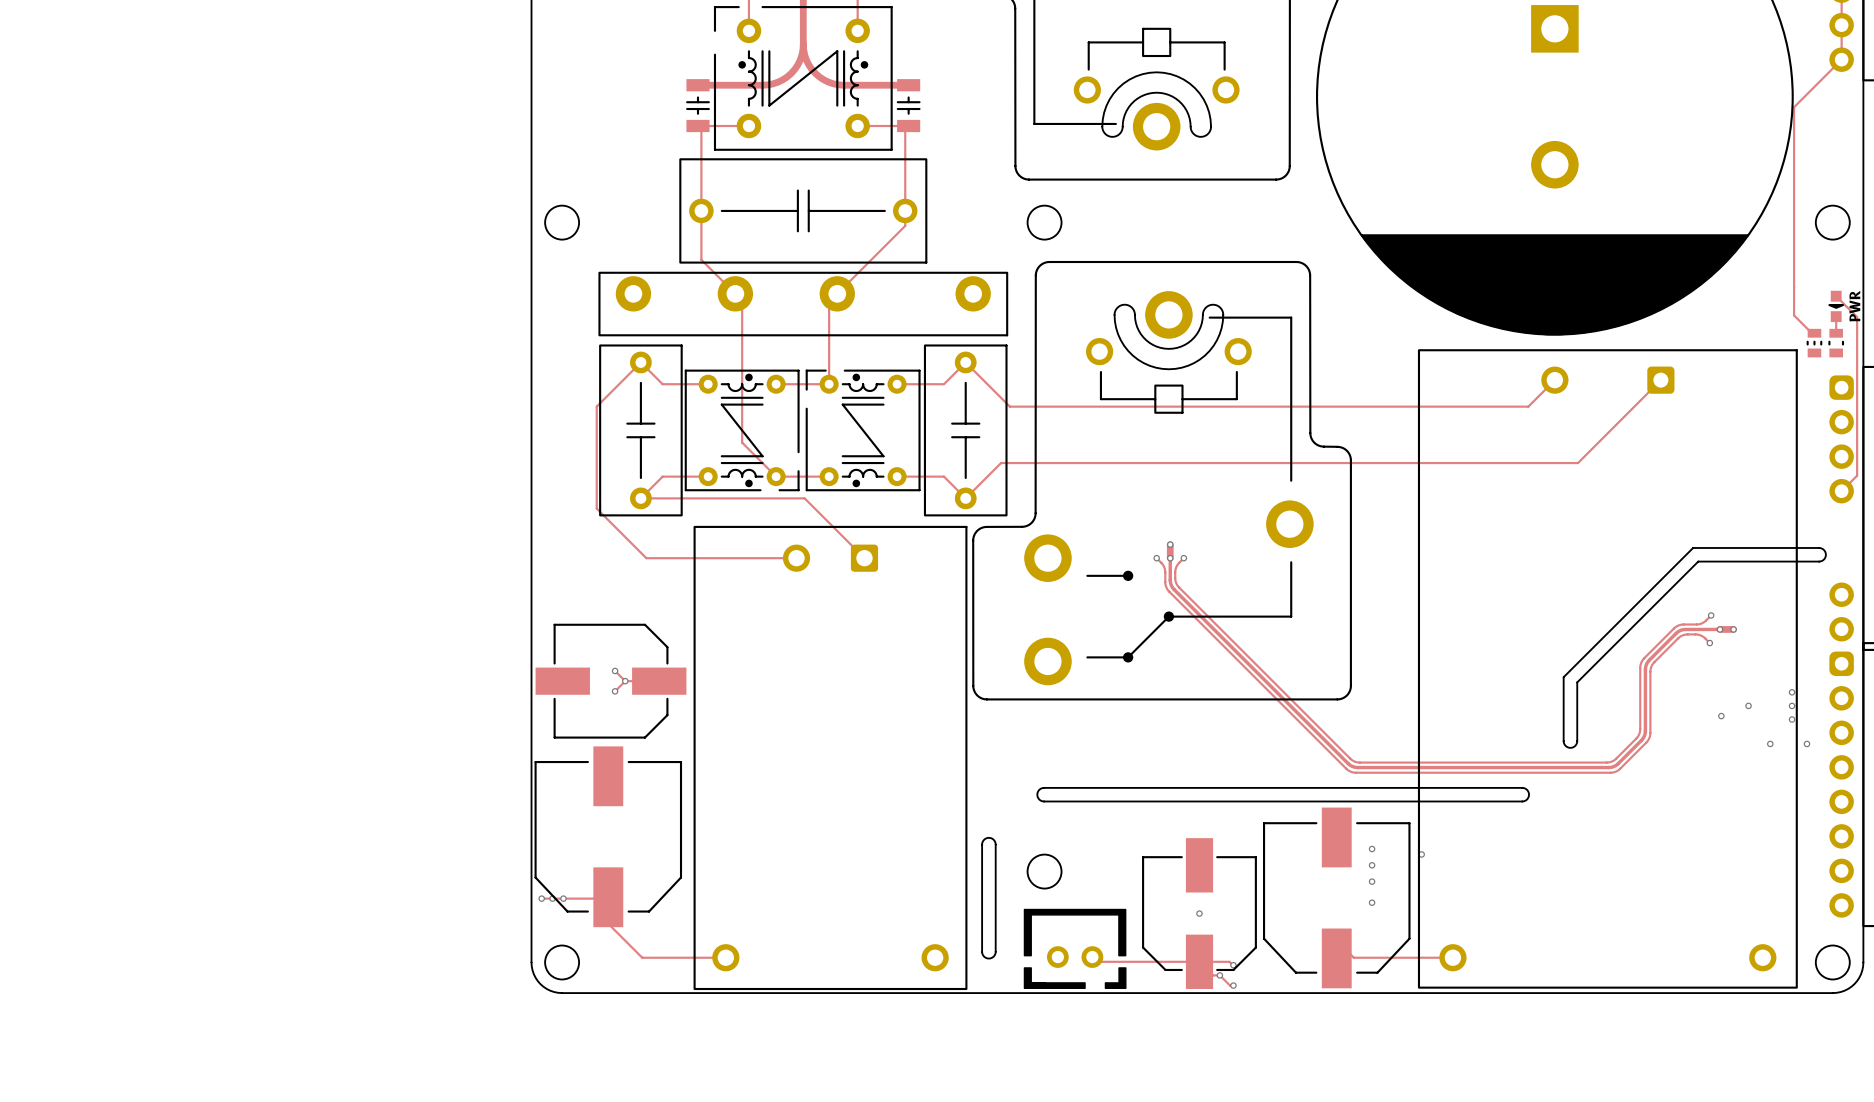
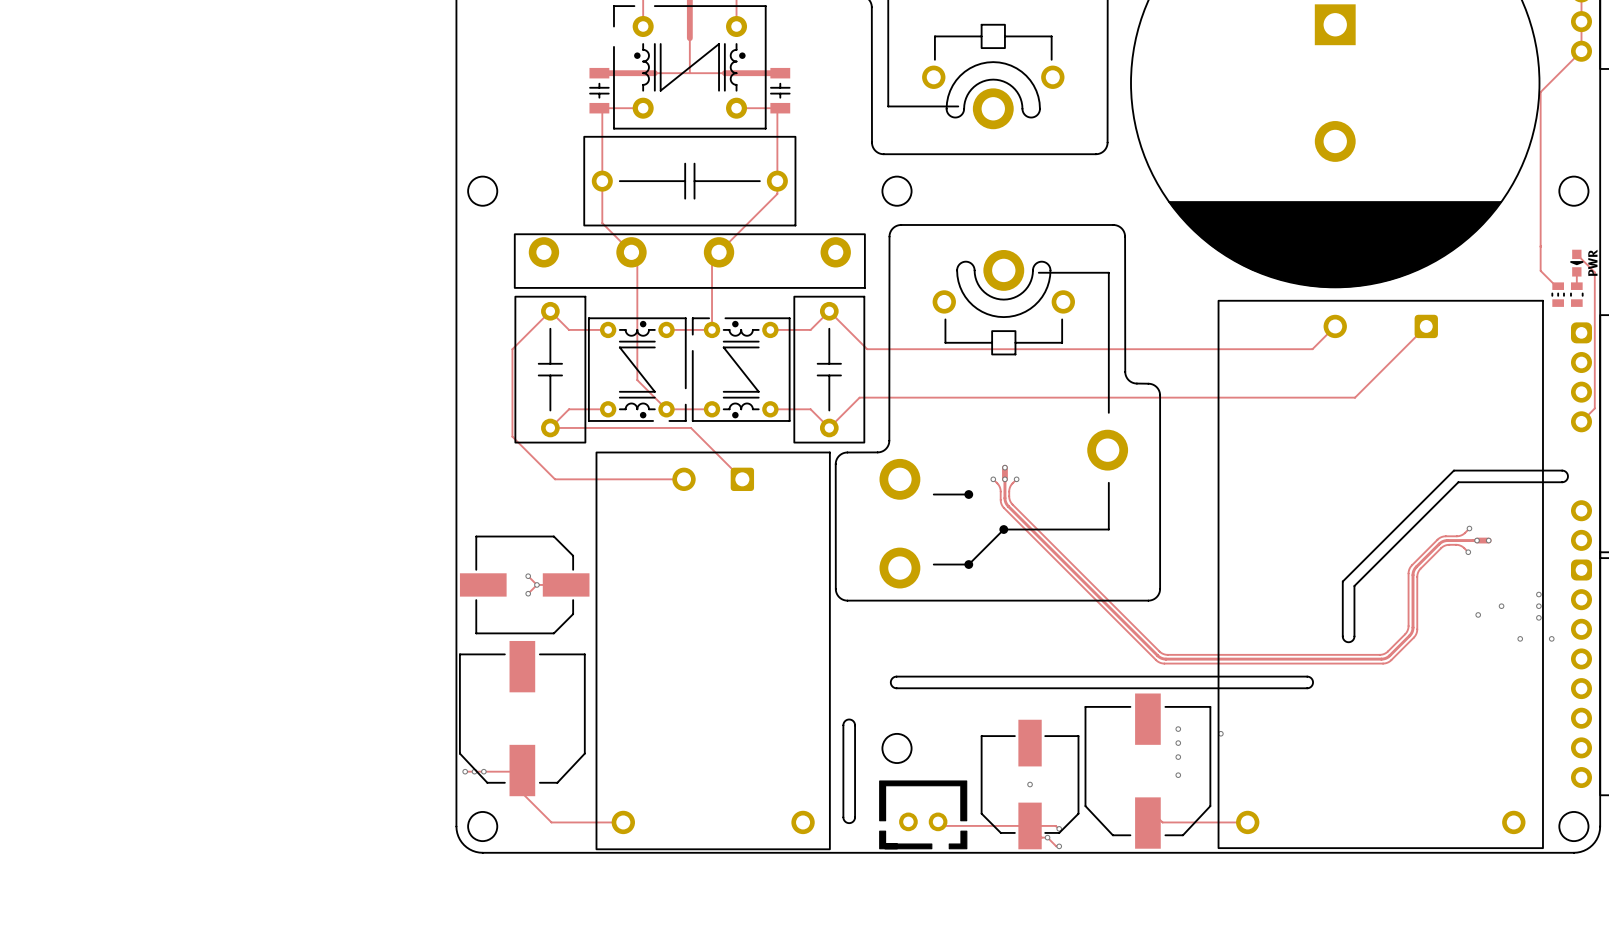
track: none -> (689, 38) (689, 73)
track: (762, 85) (778, 82) (791, 73) (800, 60) (803, 44) (806, 60) (815, 73) (828, 82) (844, 85) -> (654, 73) (724, 73)

